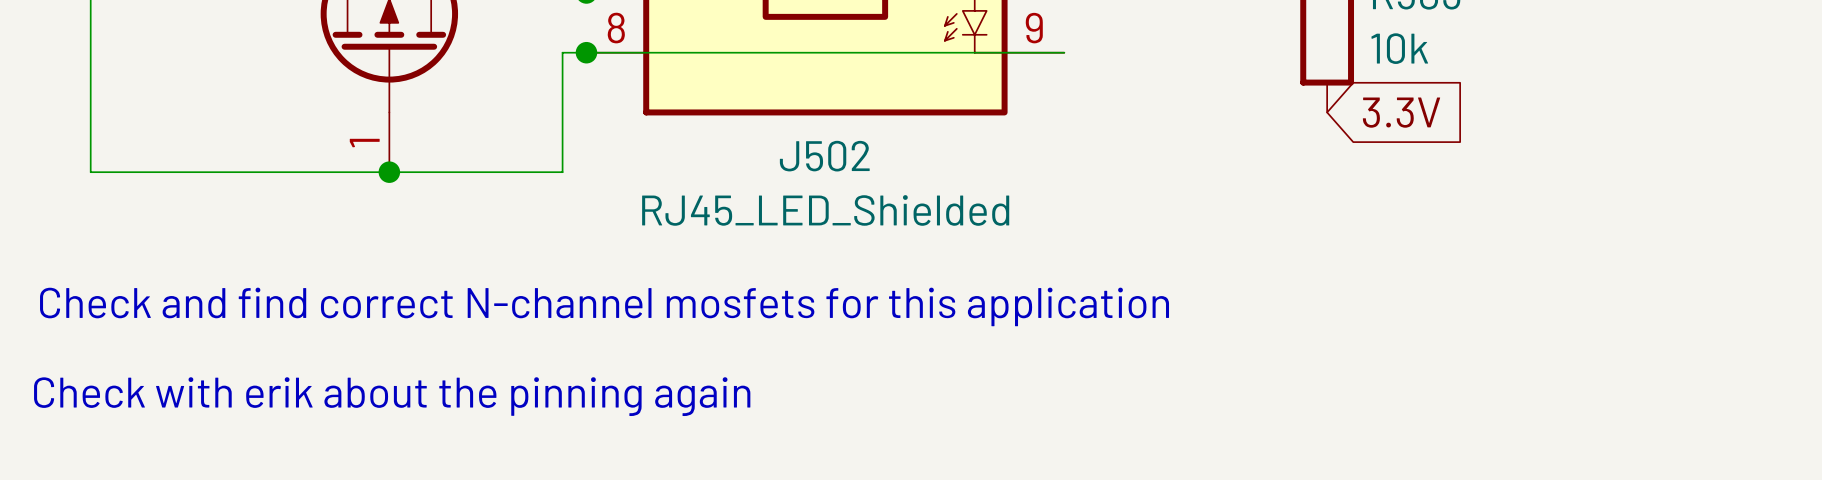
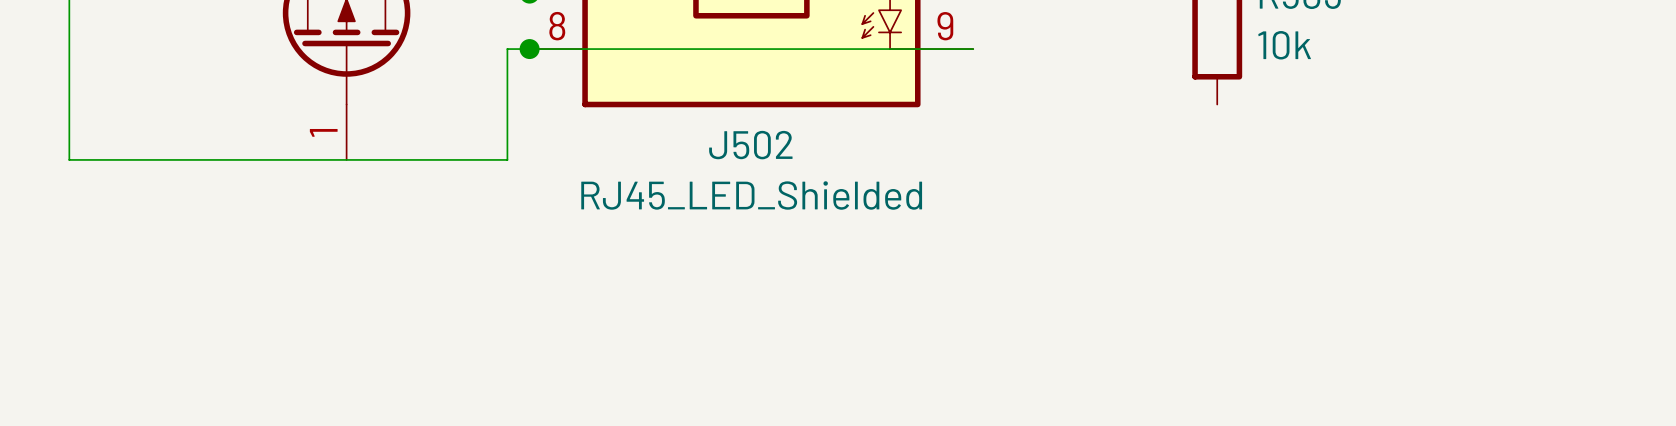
global label: 3.3V (1401, 112) -> none
junction: (389, 172) -> none
text: Check and find correct N-channel mosfets for this application (604, 306) -> none
text: Check with erik about the pinning again (392, 396) -> none

